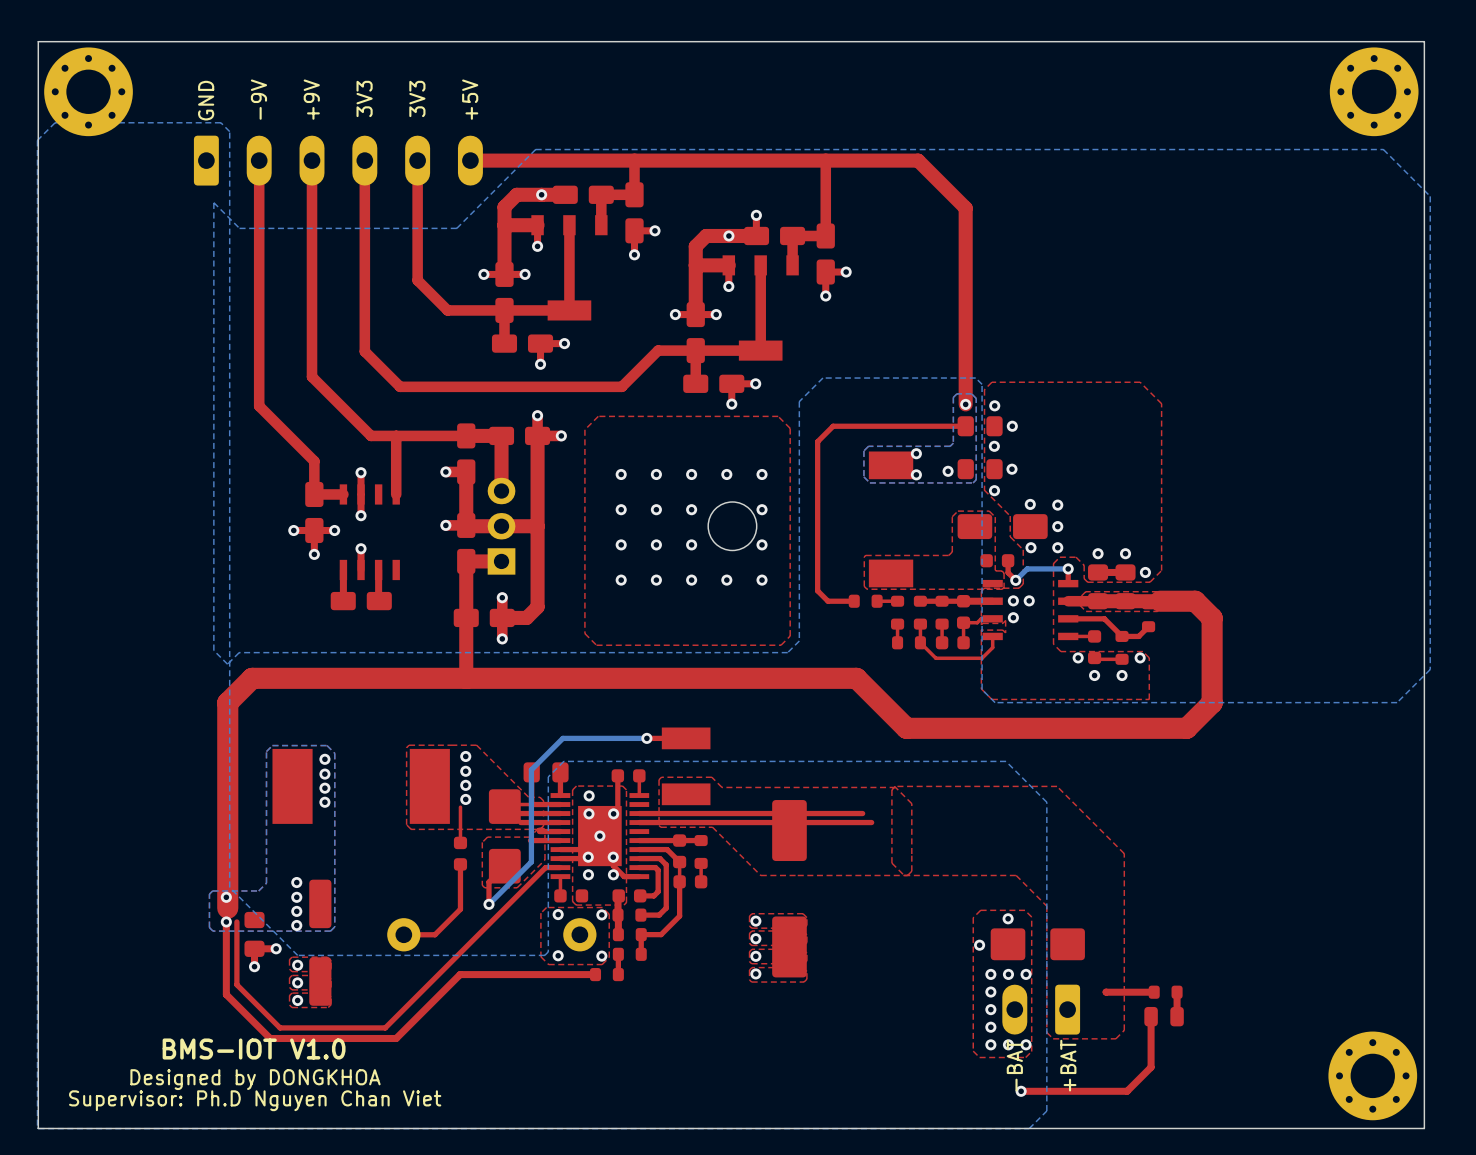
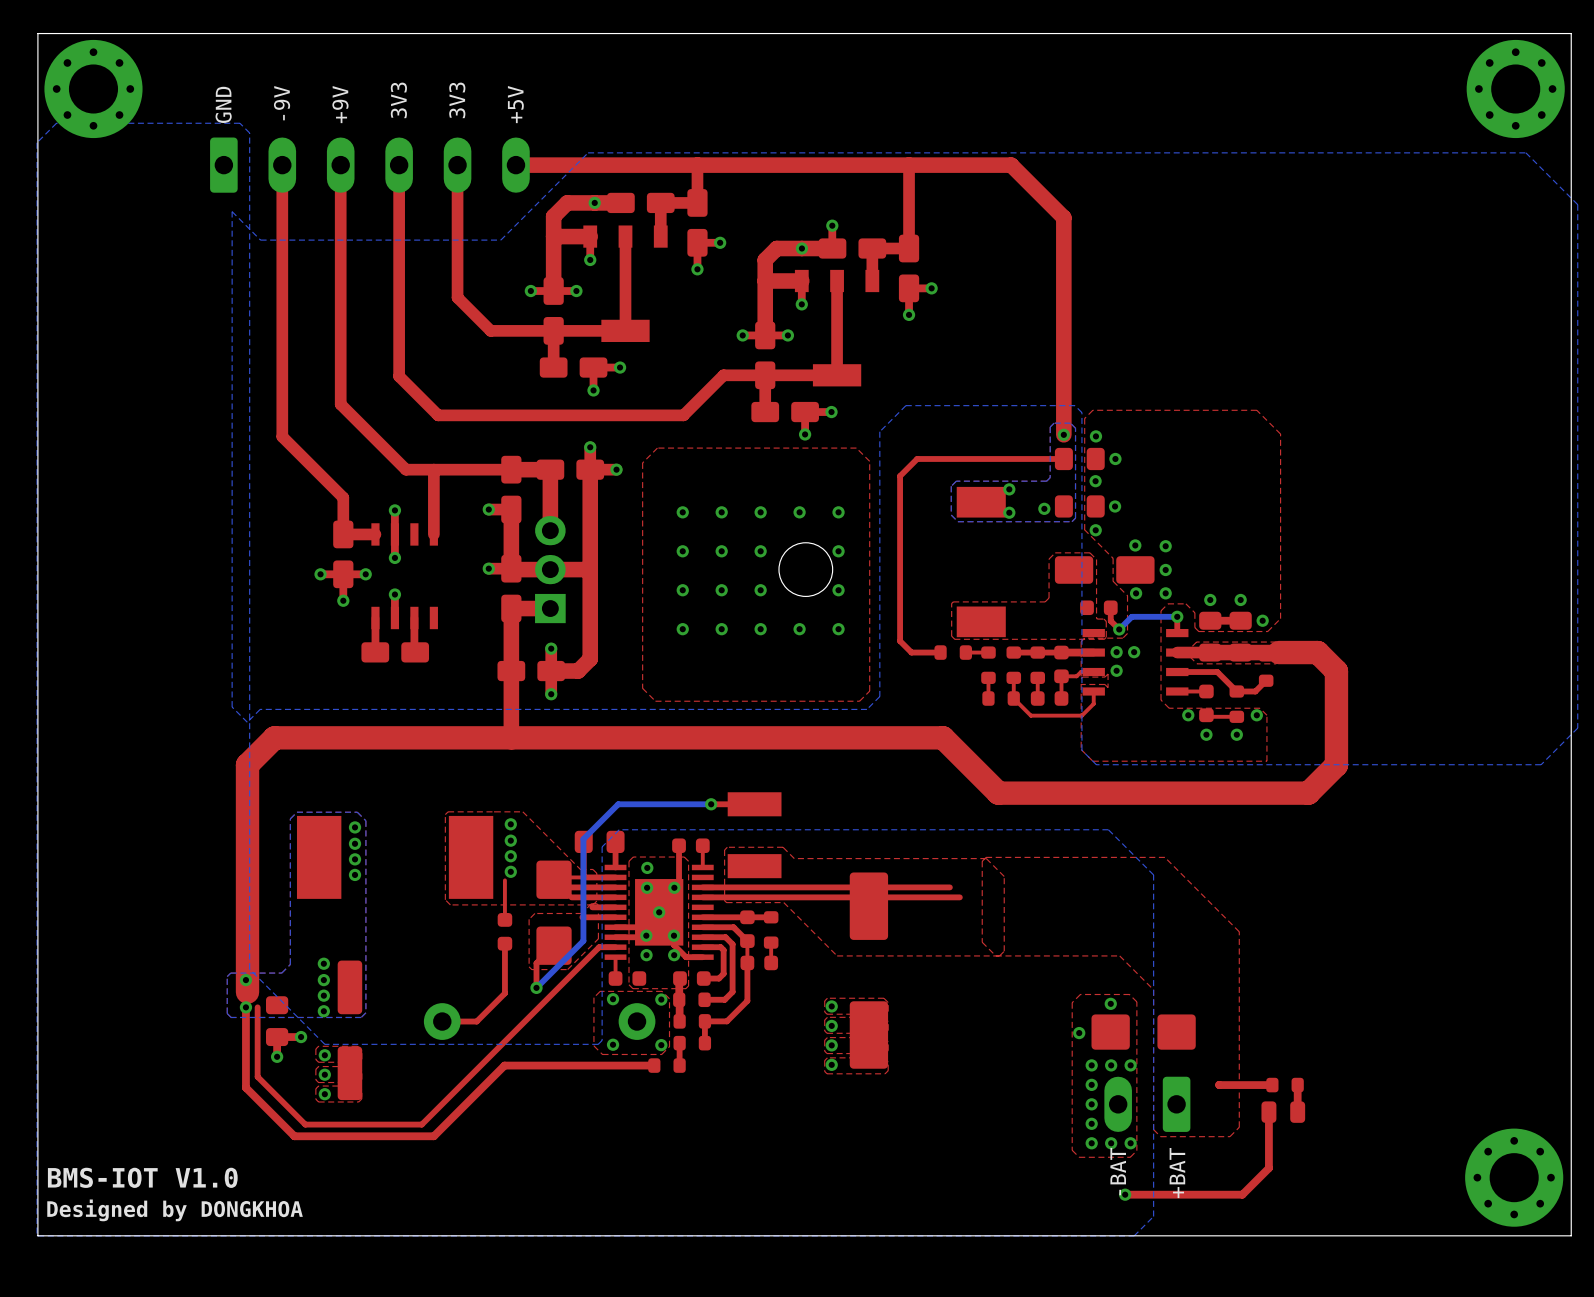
text position: BMS-IOT V1.0 (254, 1049) -> BMS-IOT V1.0 (142, 1177)
text position: Designed by DONGKHOA (255, 1079) -> Designed by DONGKHOA (175, 1210)
text: Supervisor: Ph.D Nguyen Chan Viet (255, 1100) -> none

